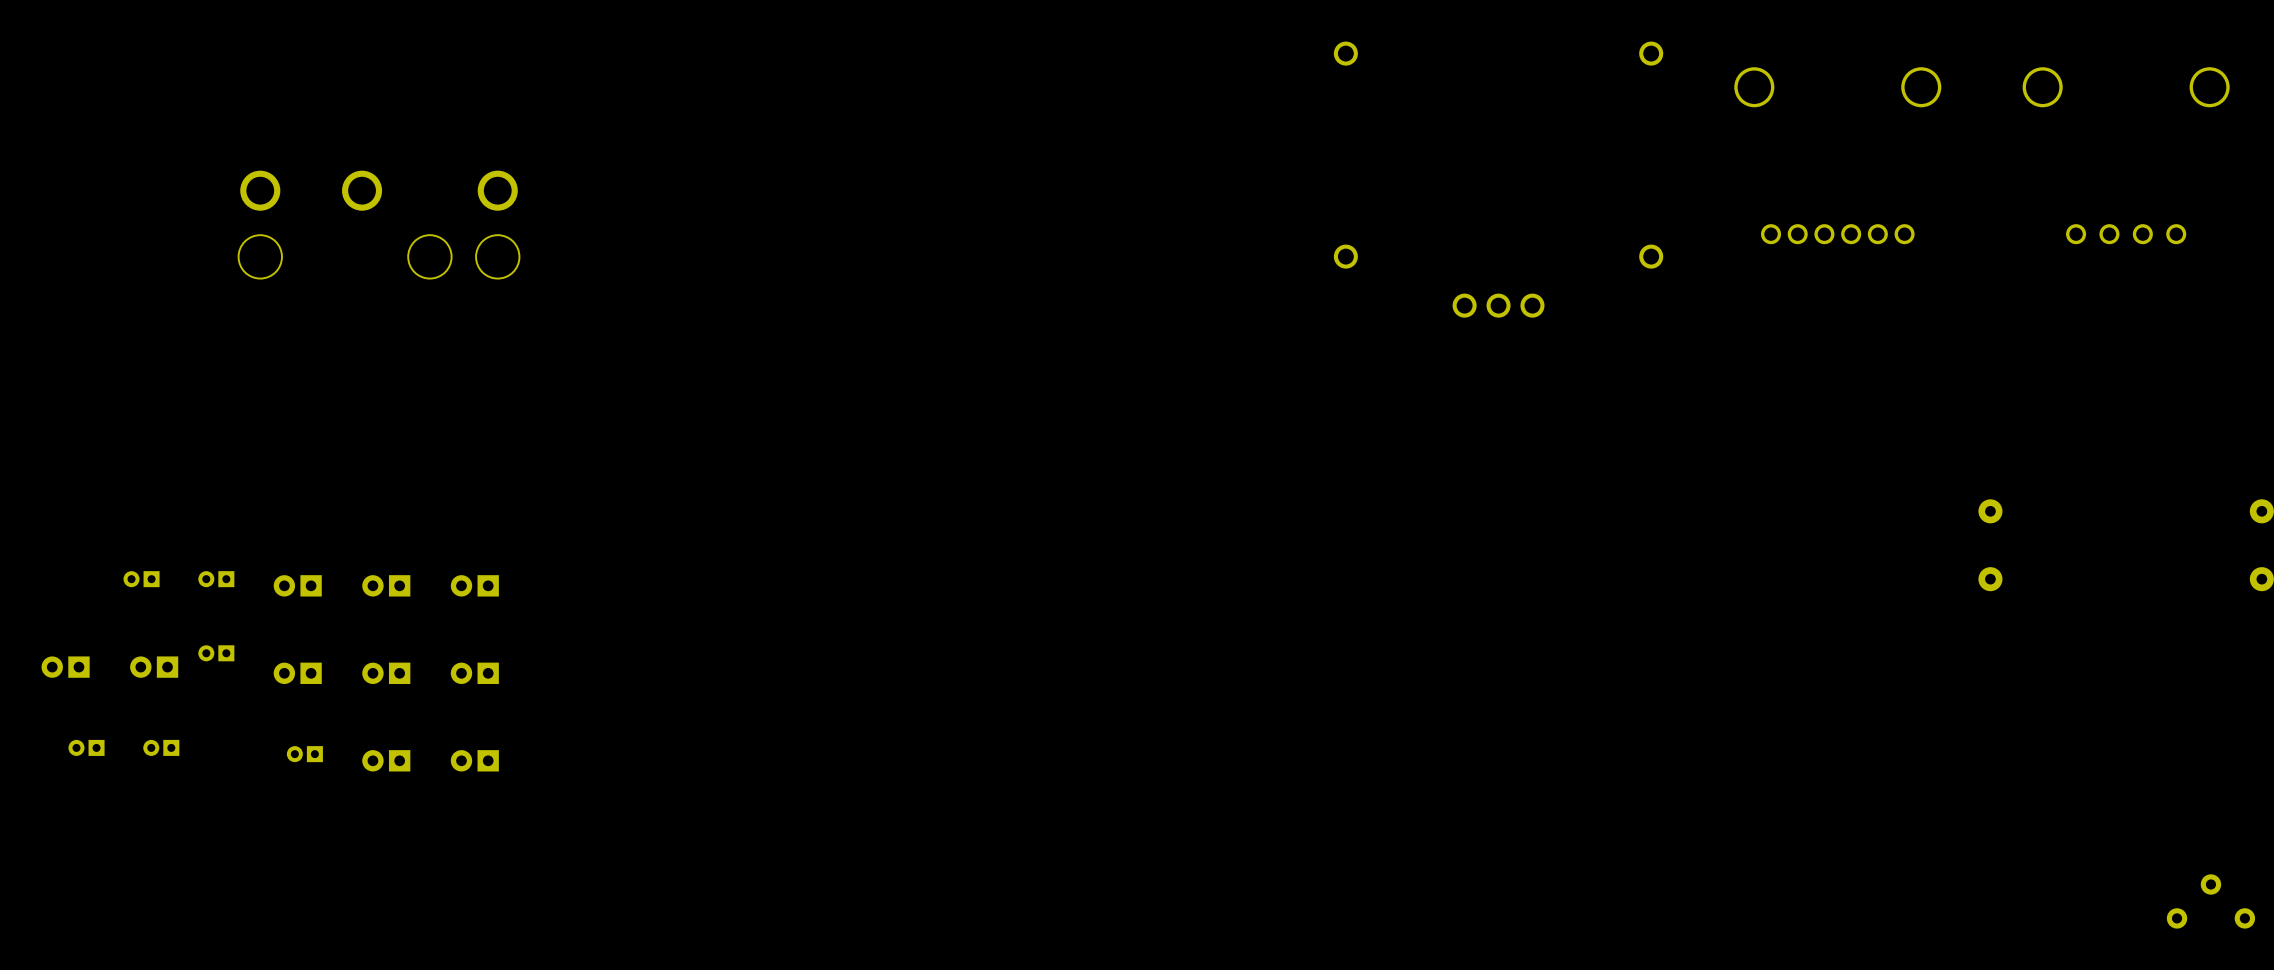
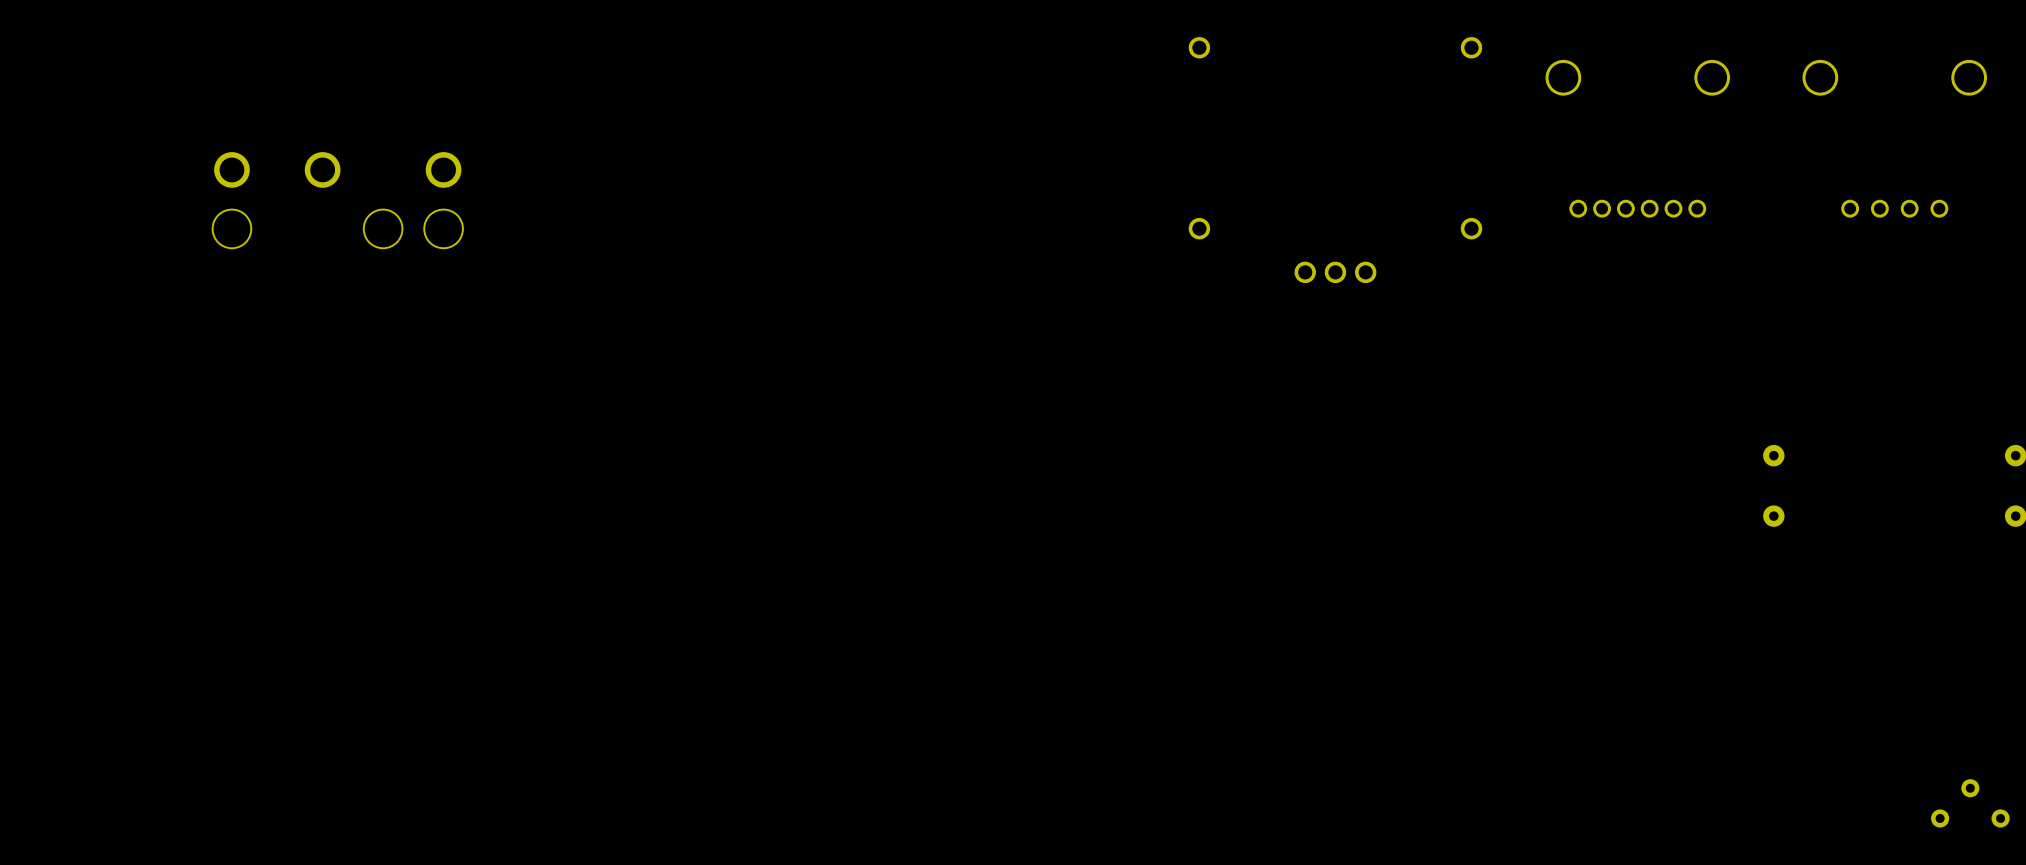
part: (141, 579) -> none
part: (216, 579) -> none
part: (297, 585) -> none
part: (386, 585) -> none
part: (474, 585) -> none
part: (216, 653) -> none
part: (65, 667) -> none
part: (154, 667) -> none
part: (297, 673) -> none
part: (386, 673) -> none
part: (474, 673) -> none
part: (86, 747) -> none
part: (161, 747) -> none
part: (304, 754) -> none
part: (386, 760) -> none
part: (474, 760) -> none

